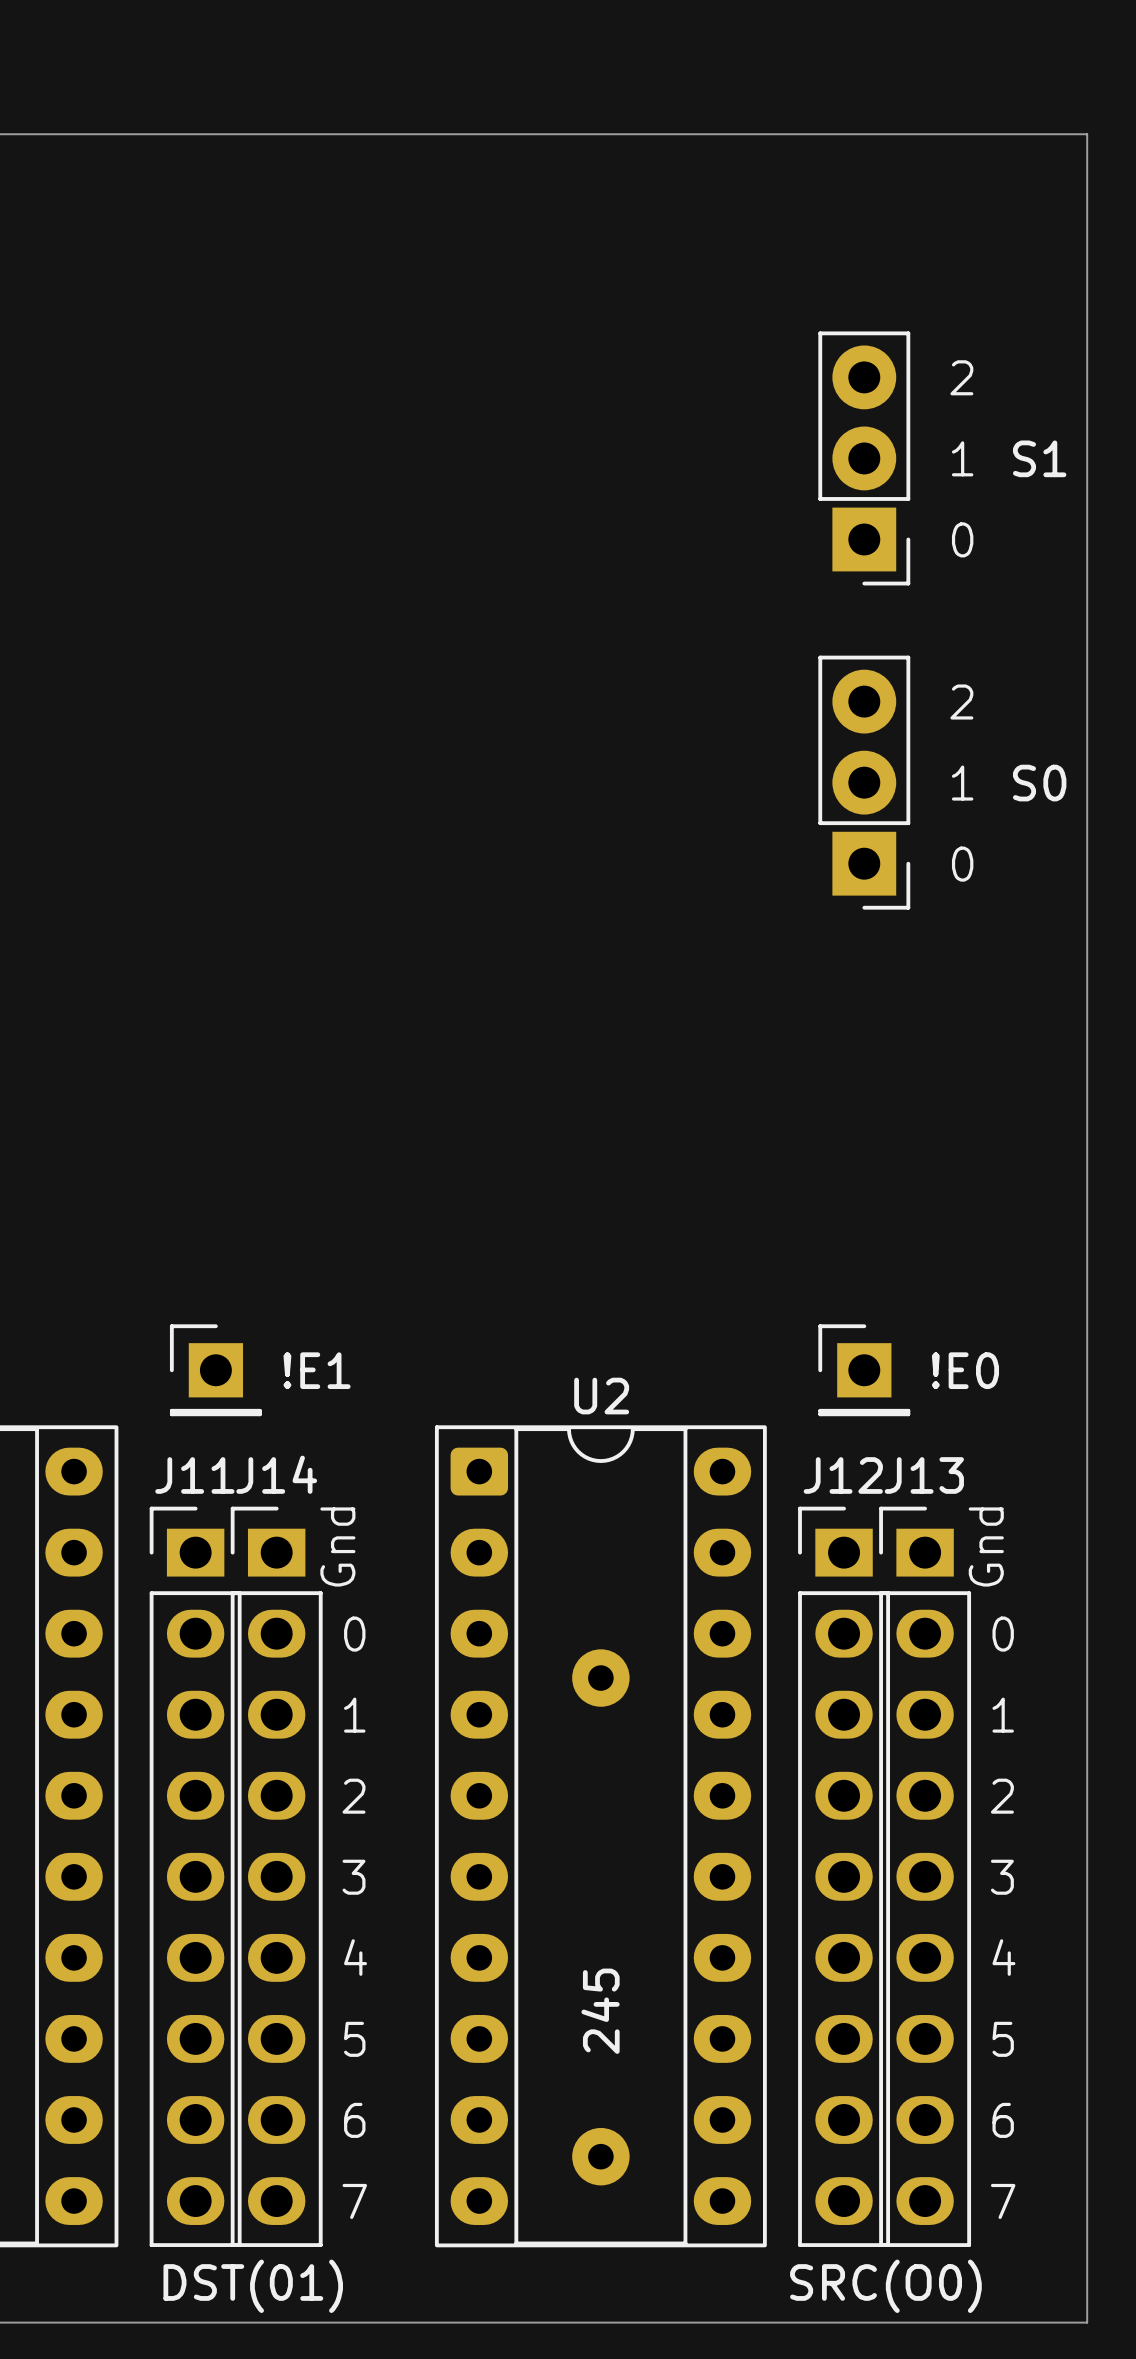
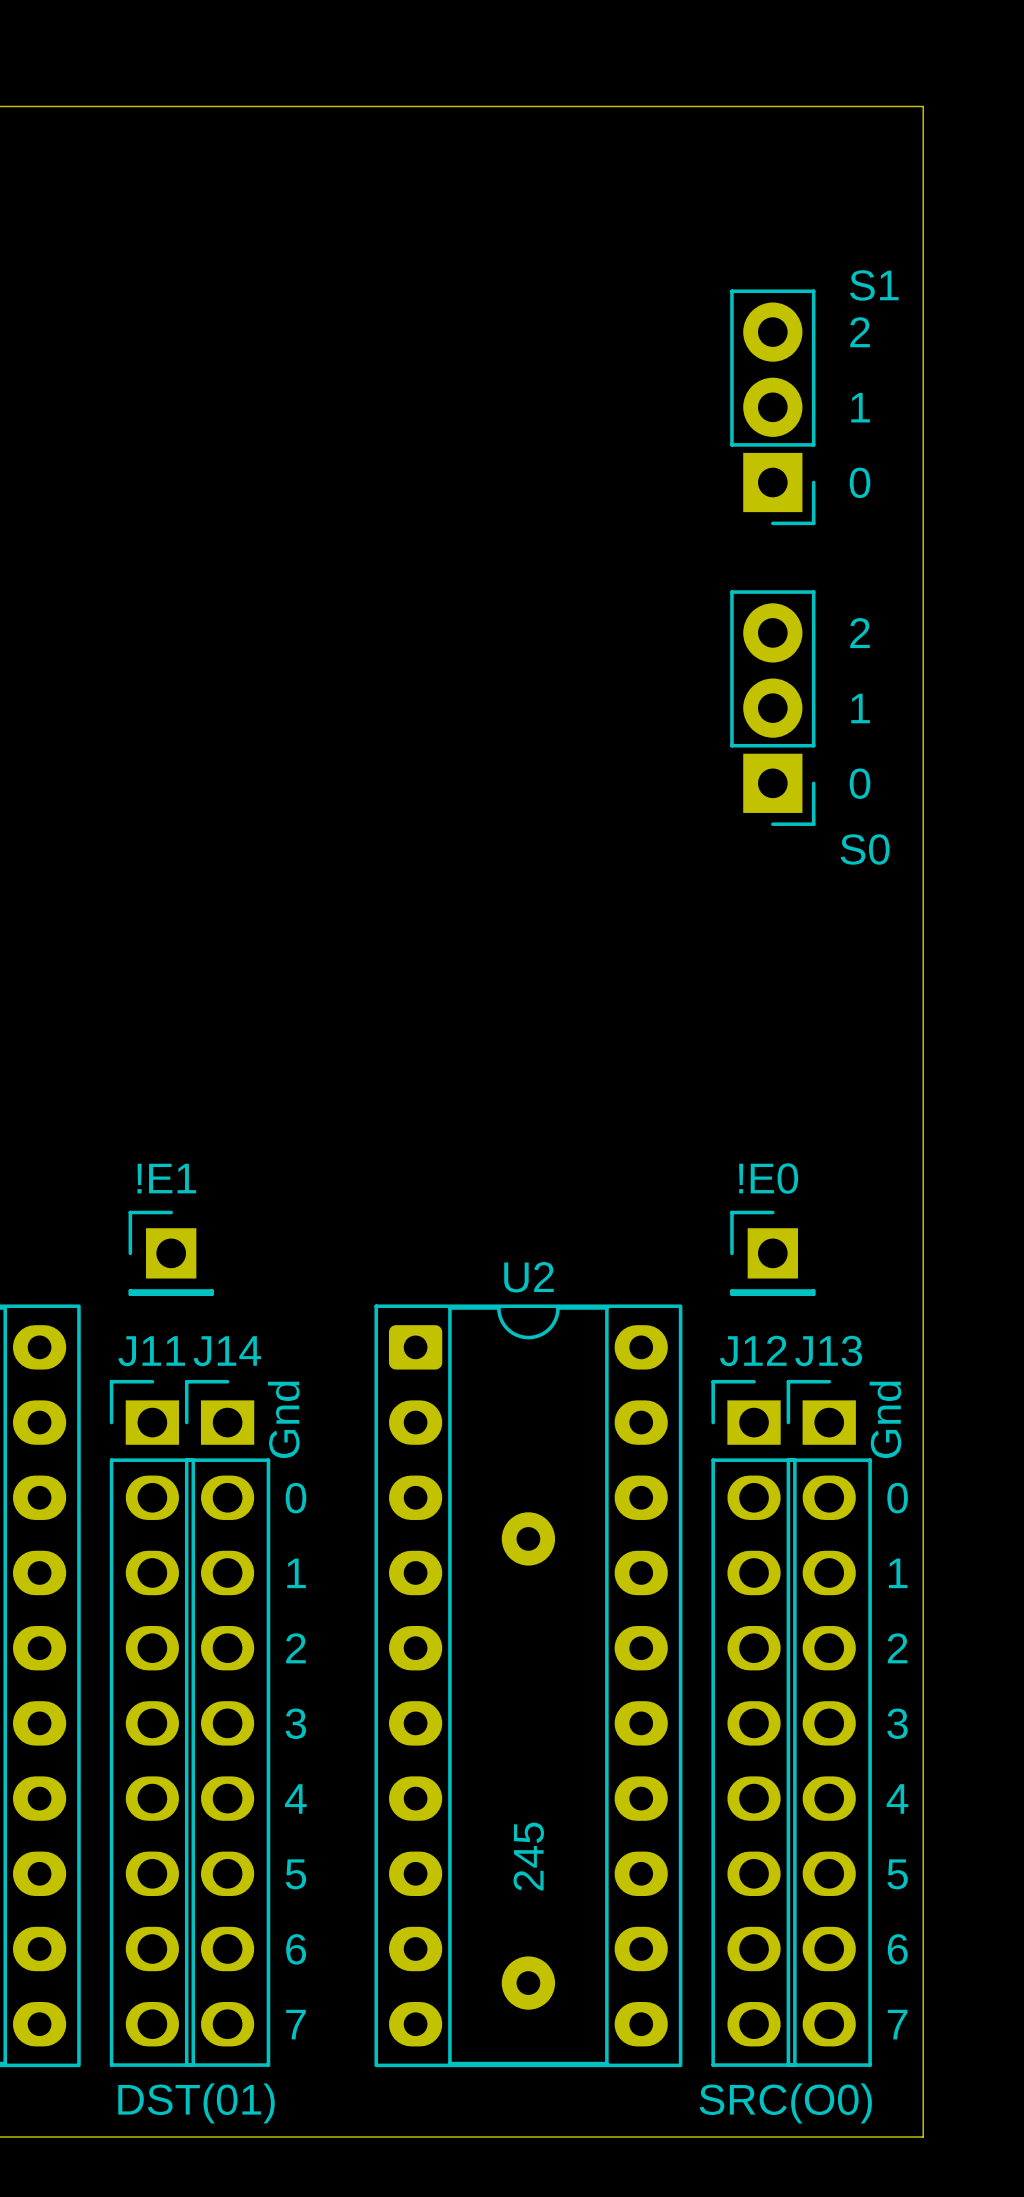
board edge: (1026, 134) (1087, 134) (1087, 2322) (1026, 2322) -> (923, 106) (923, 2137)
text position: S1 (1039, 458) -> S1 (874, 285)
text position: S0 (1039, 783) -> S0 (865, 849)
text position: !E1 (317, 1370) -> !E1 (166, 1178)
text position: !E0 (965, 1370) -> !E0 (768, 1178)

